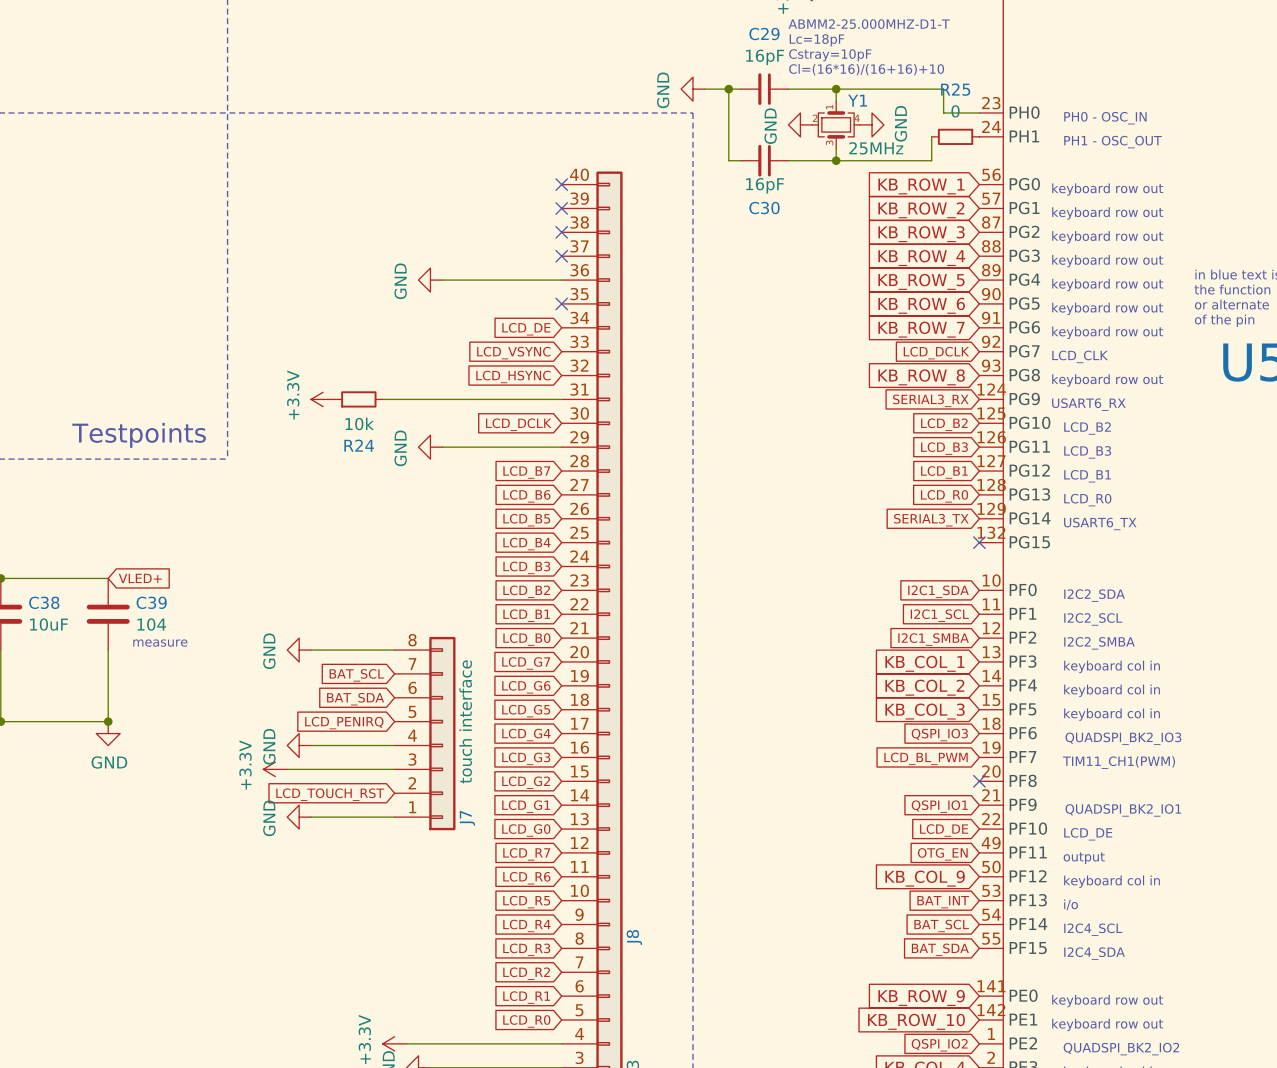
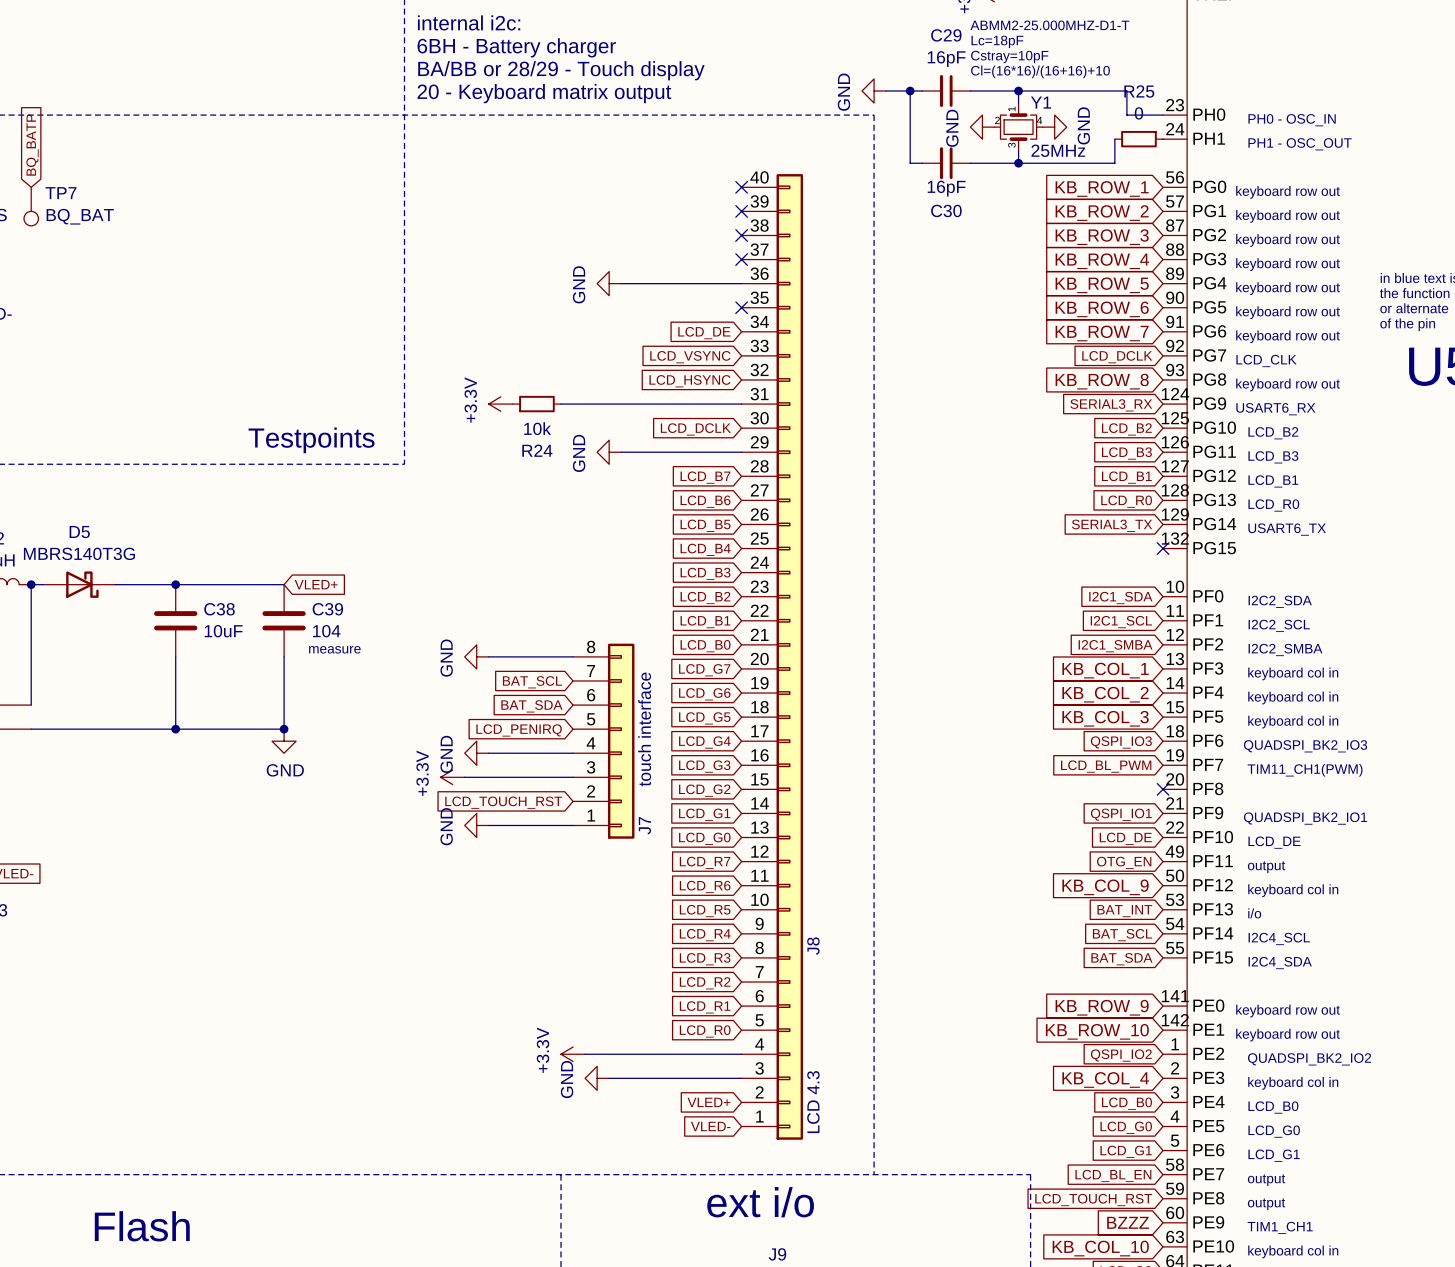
text: none -> internal i2c: (469, 22)
text: none -> 6BH - Battery charger (516, 47)
text: none -> BA/BB or 28/29 - Touch display (561, 70)
text: none -> 20 - Keyboard matrix output (544, 93)

